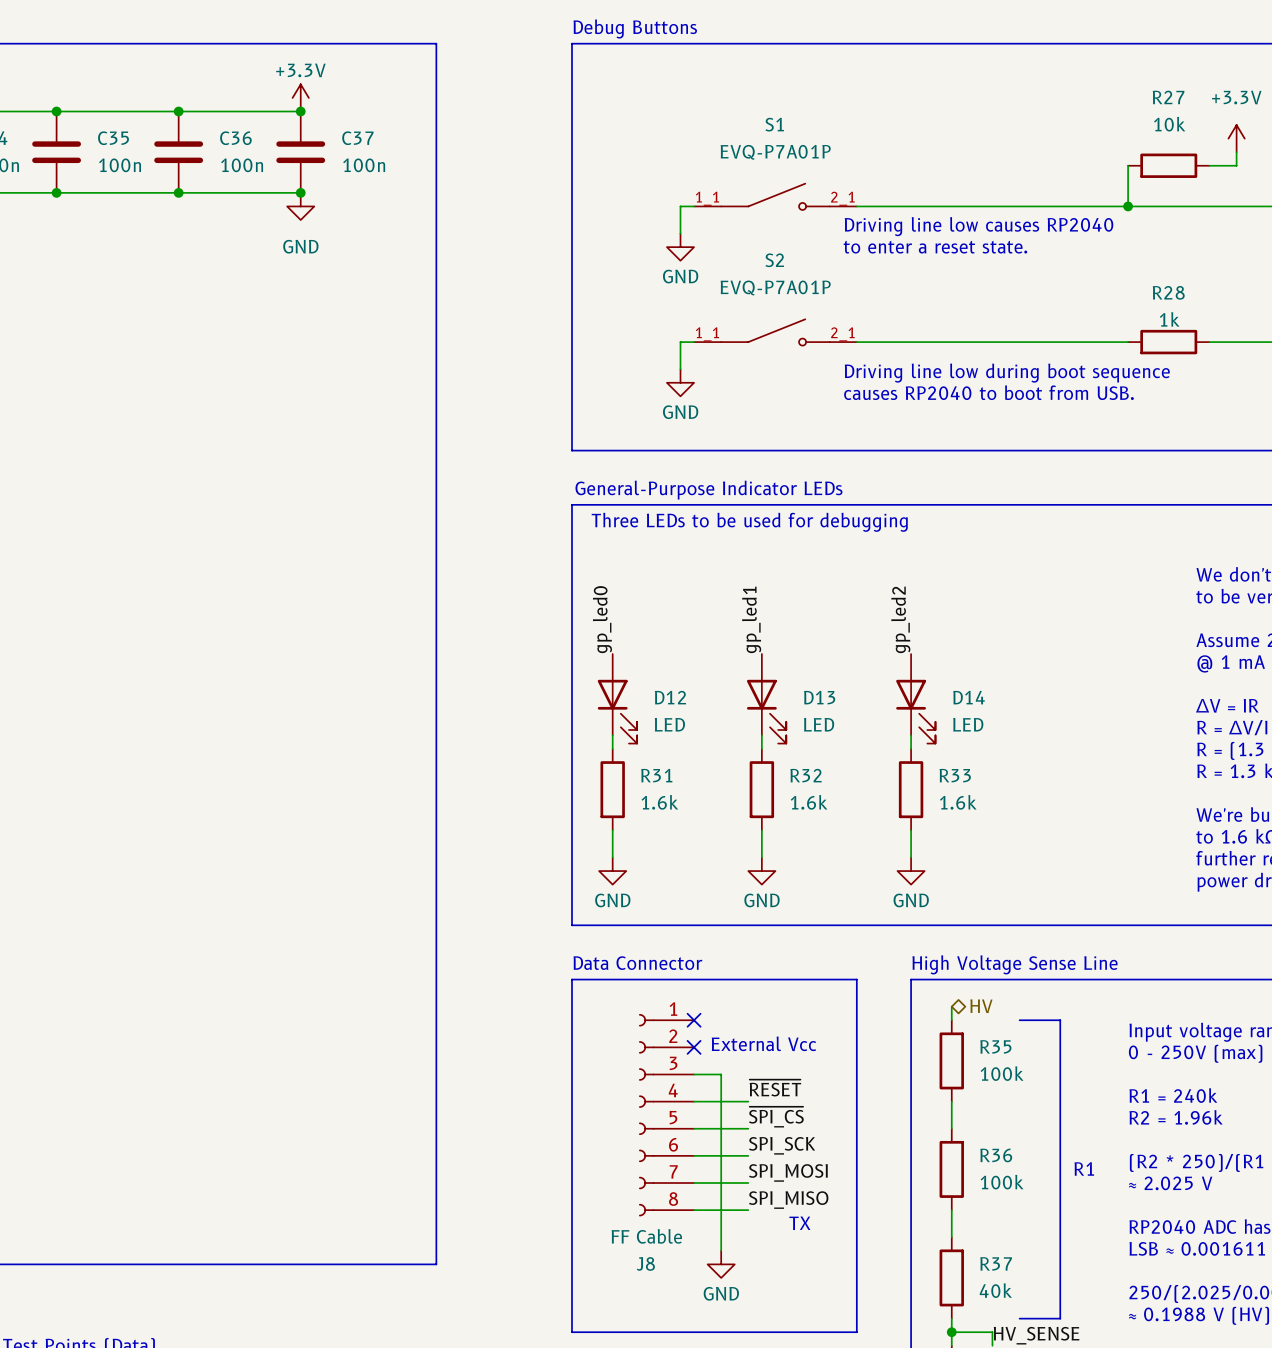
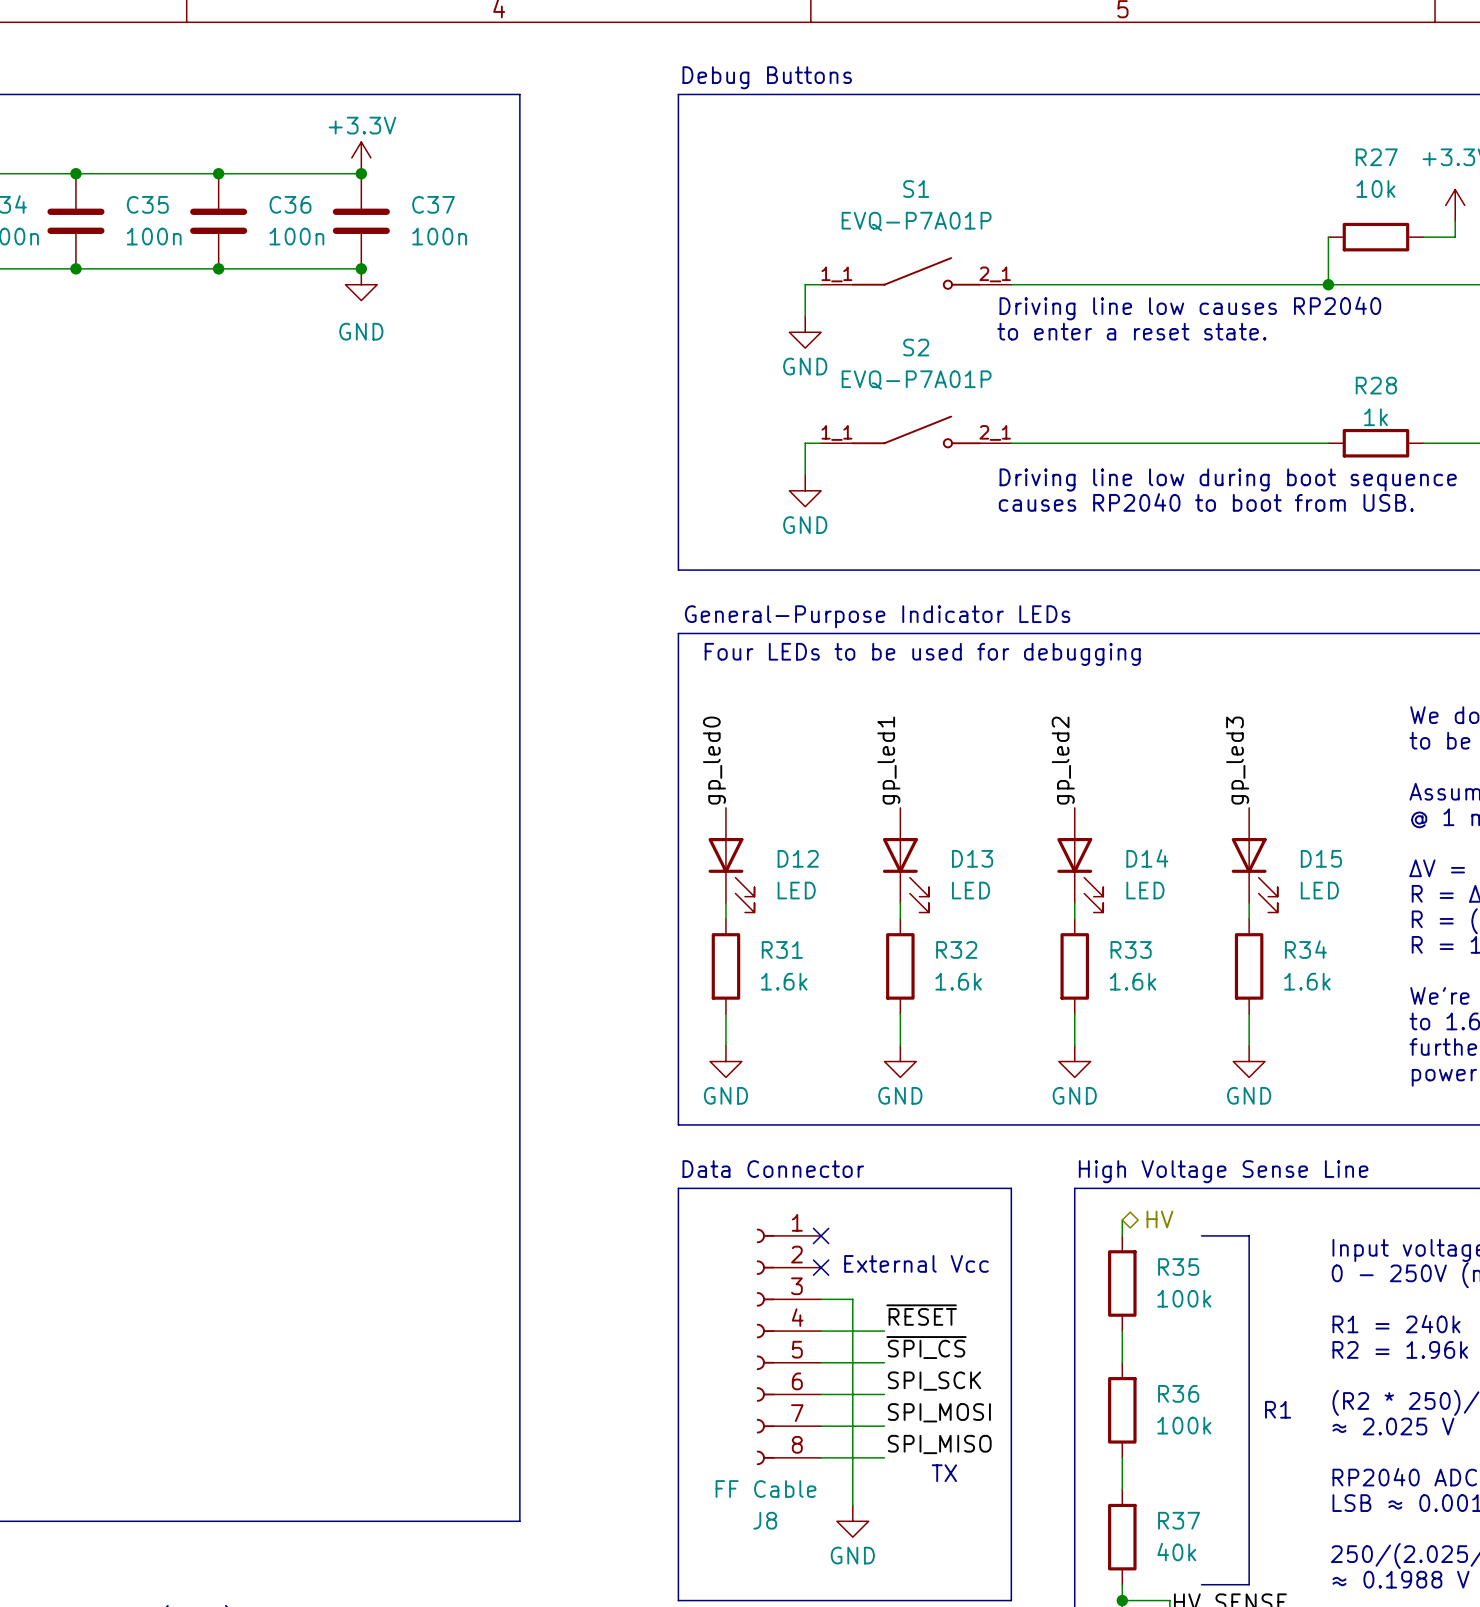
text: Three LEDs to be used for debugging (749, 522) -> Four LEDs to be used for debugging (922, 654)
label: none -> gp_led3 (1237, 760)
D15: none -> LED (1254, 860)
wire: none -> (1249, 903) (1249, 918)
R34: none -> 1.6k (1249, 966)
wire: none -> (1249, 1013) (1249, 1045)
power symbol: none -> GND (1249, 1061)

